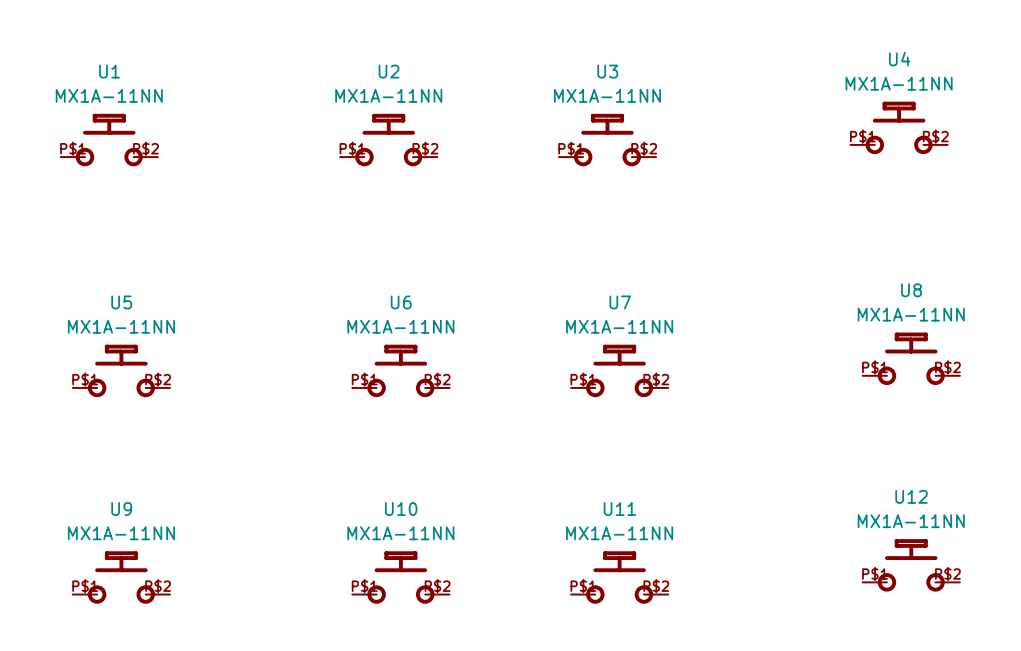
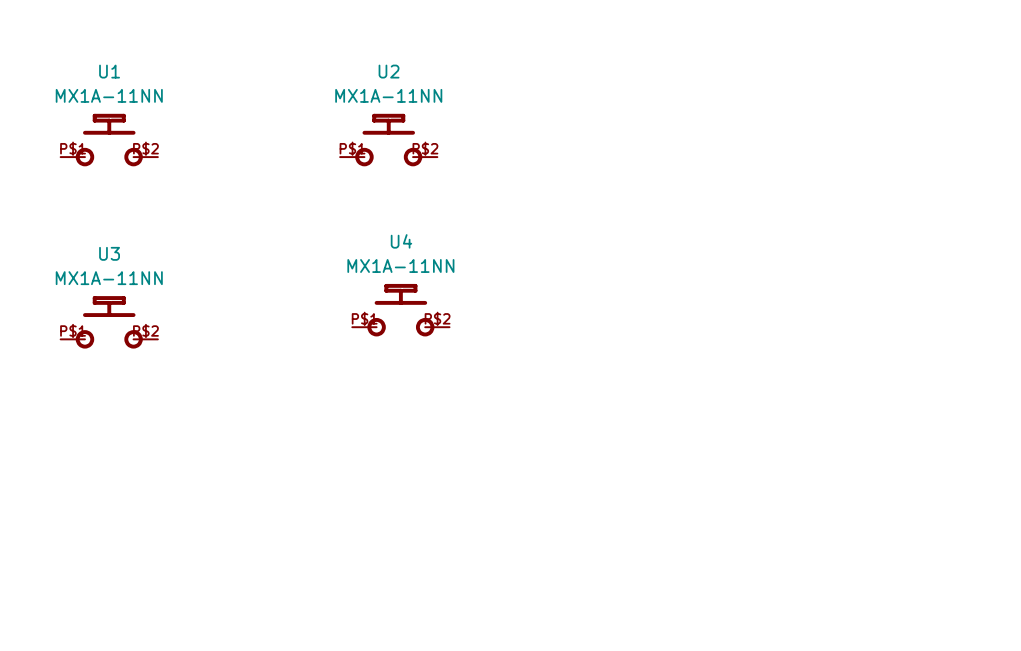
U4 position: (899, 127) -> (400, 310)
U3 position: (607, 140) -> (109, 322)
U8: MX1A-11NN (911, 358) -> none
U5: MX1A-11NN (121, 370) -> none
U6: MX1A-11NN (400, 370) -> none
U7: MX1A-11NN (619, 370) -> none
U12: MX1A-11NN (911, 565) -> none
U9: MX1A-11NN (121, 577) -> none
U10: MX1A-11NN (400, 577) -> none
U11: MX1A-11NN (619, 577) -> none

